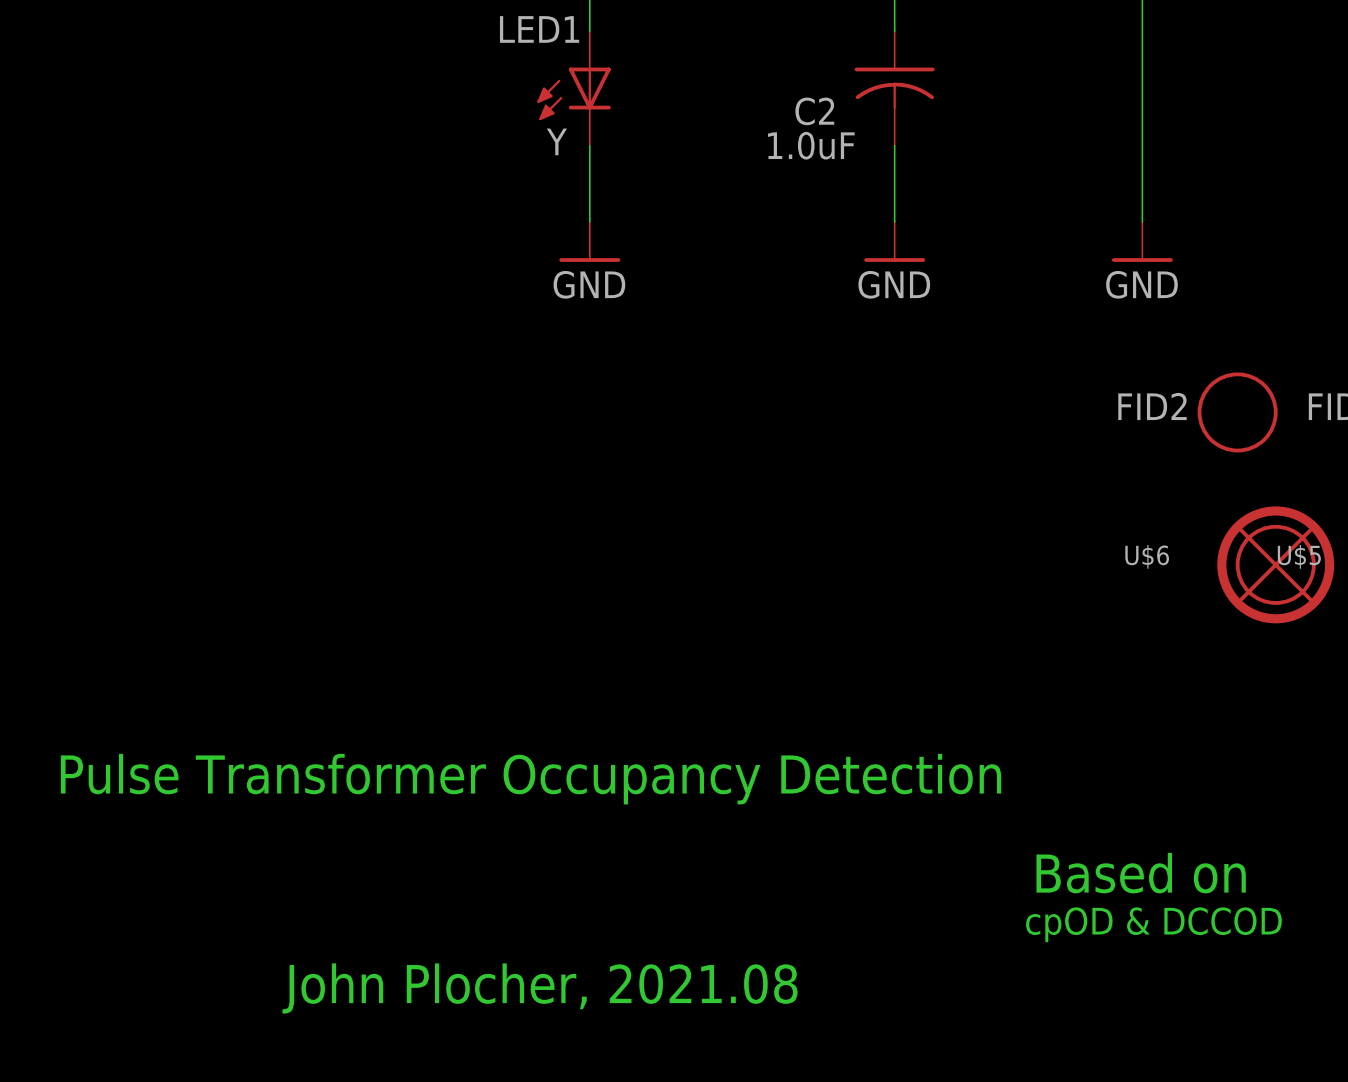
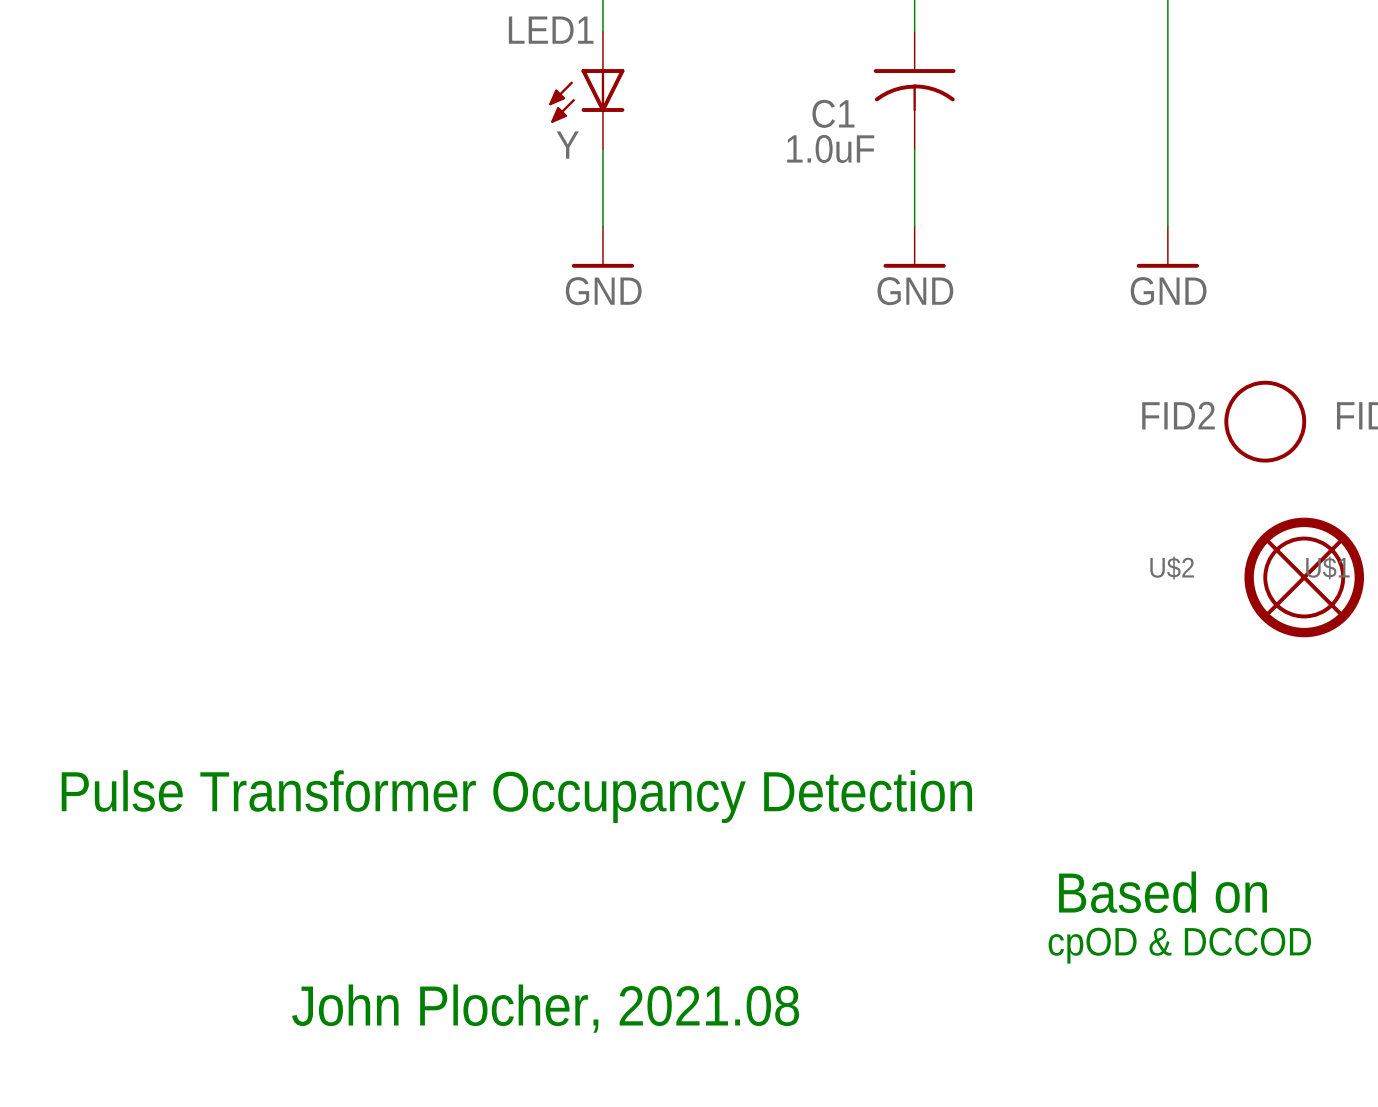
C2 name: C2 (814, 111) -> C1 (833, 113)
U$6 name: U$6 (1147, 556) -> U$2 (1172, 567)
U$5 name: U$5 (1299, 556) -> U$1 (1327, 567)

